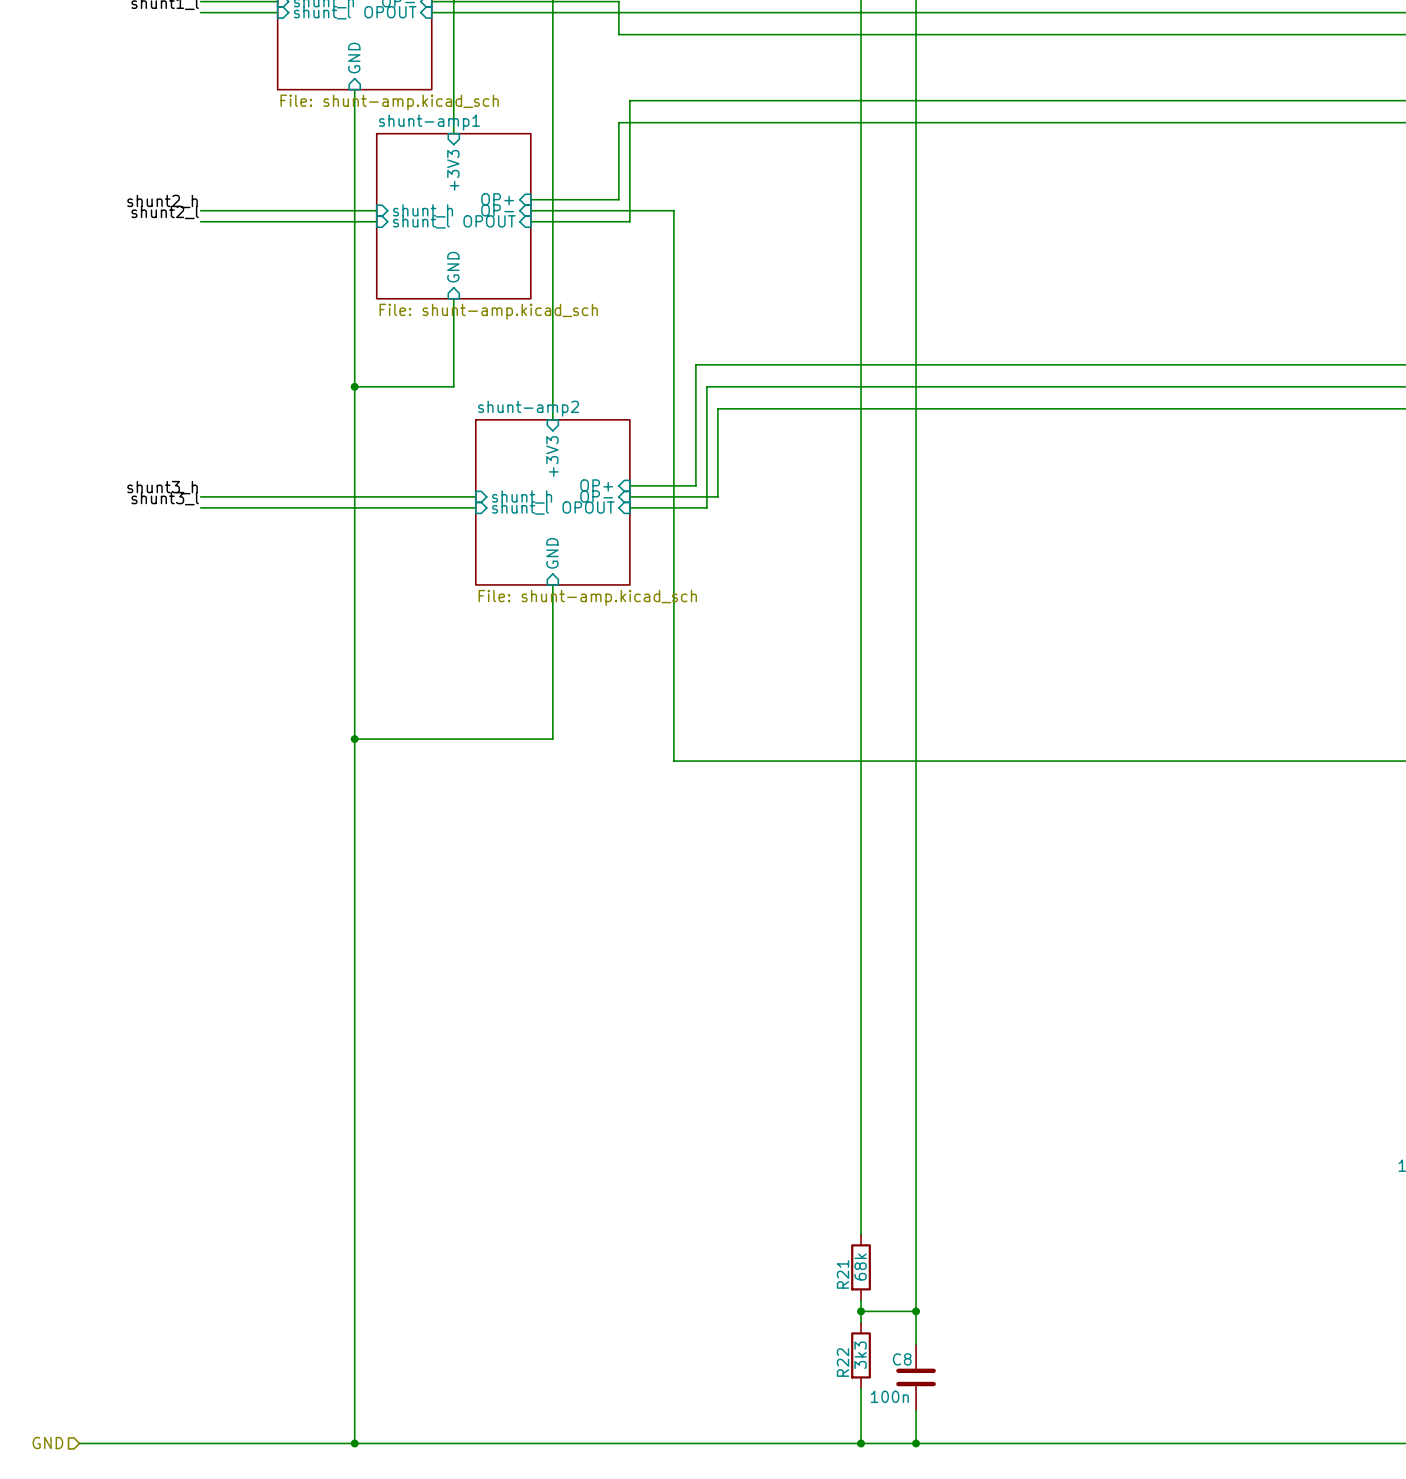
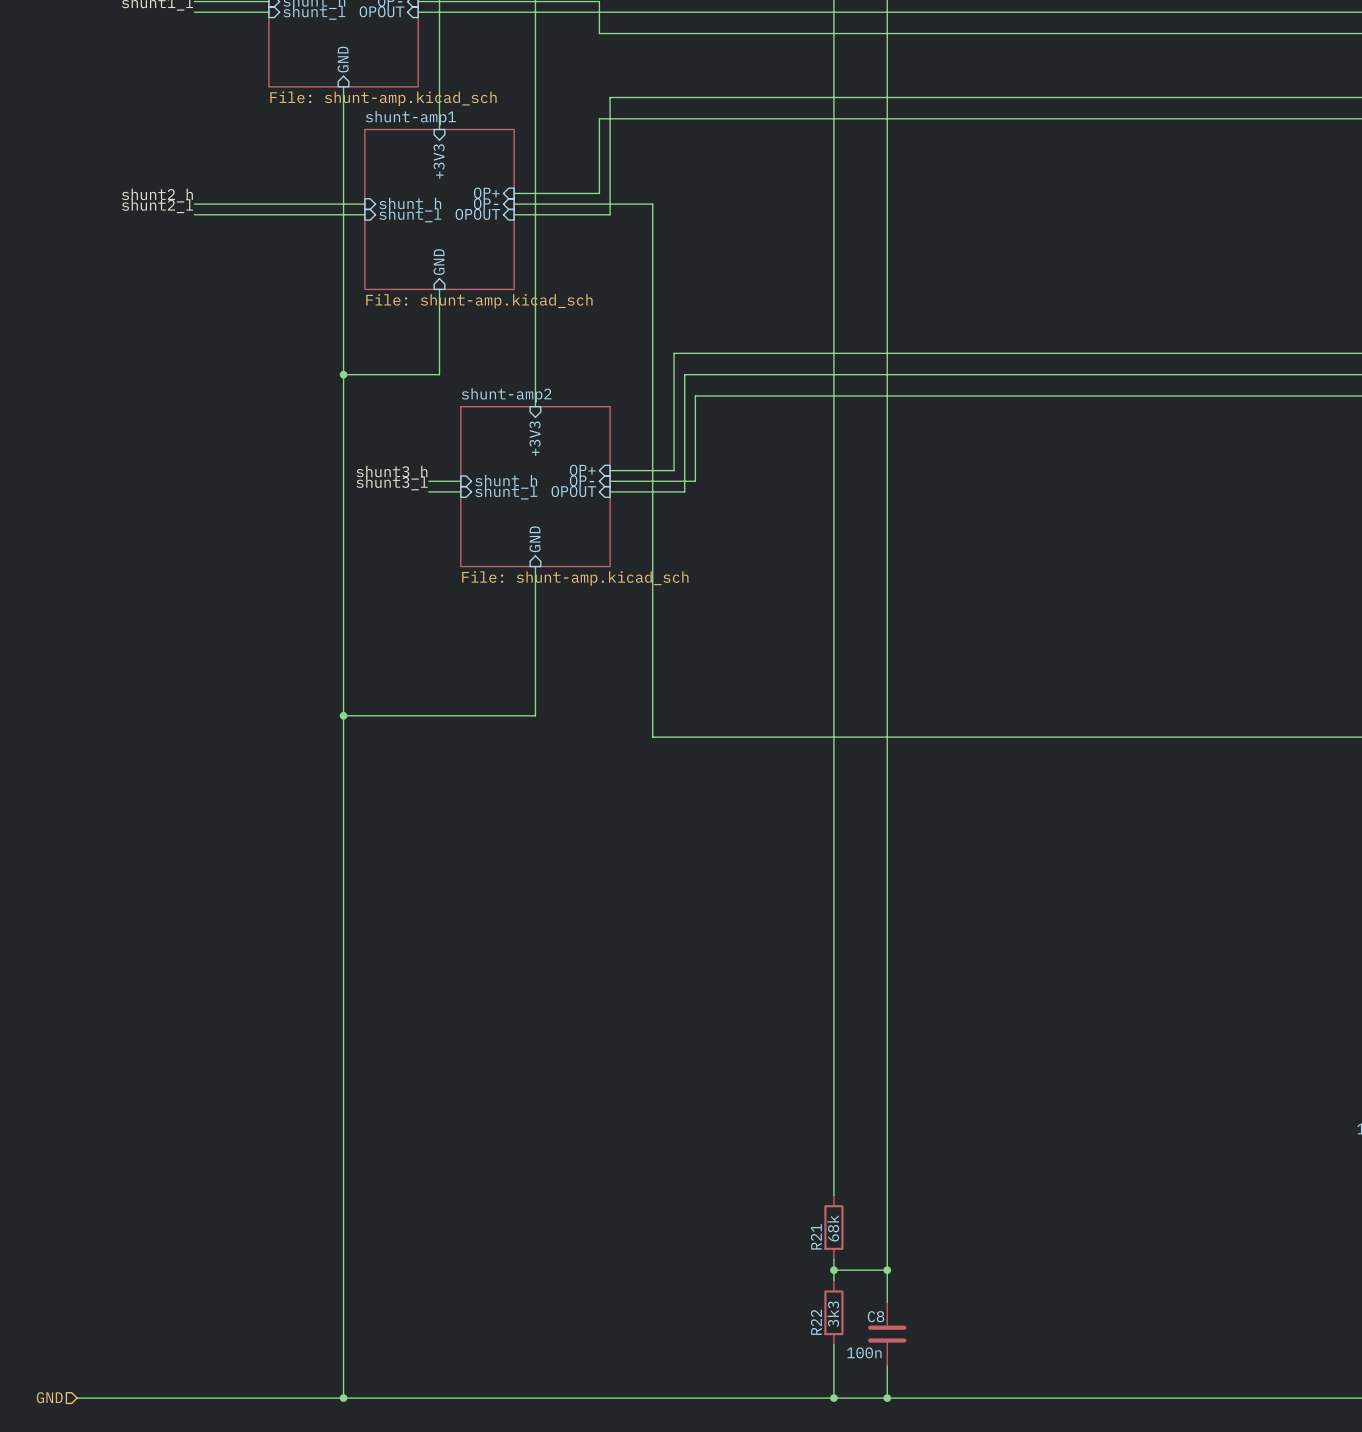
label: shunt3_h (162, 487) -> none
label: none -> shunt3_h (392, 472)
wire: (200, 496) (442, 496) -> none
label: shunt3_l (165, 498) -> none
label: none -> shunt3_l (392, 483)
wire: (200, 507) (442, 507) -> none

